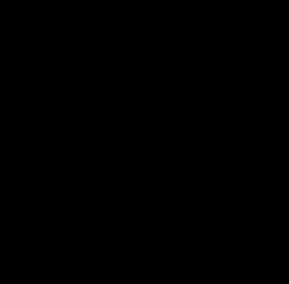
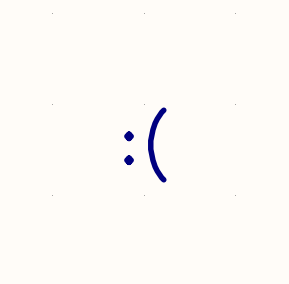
text: none -> :( (145, 145)

